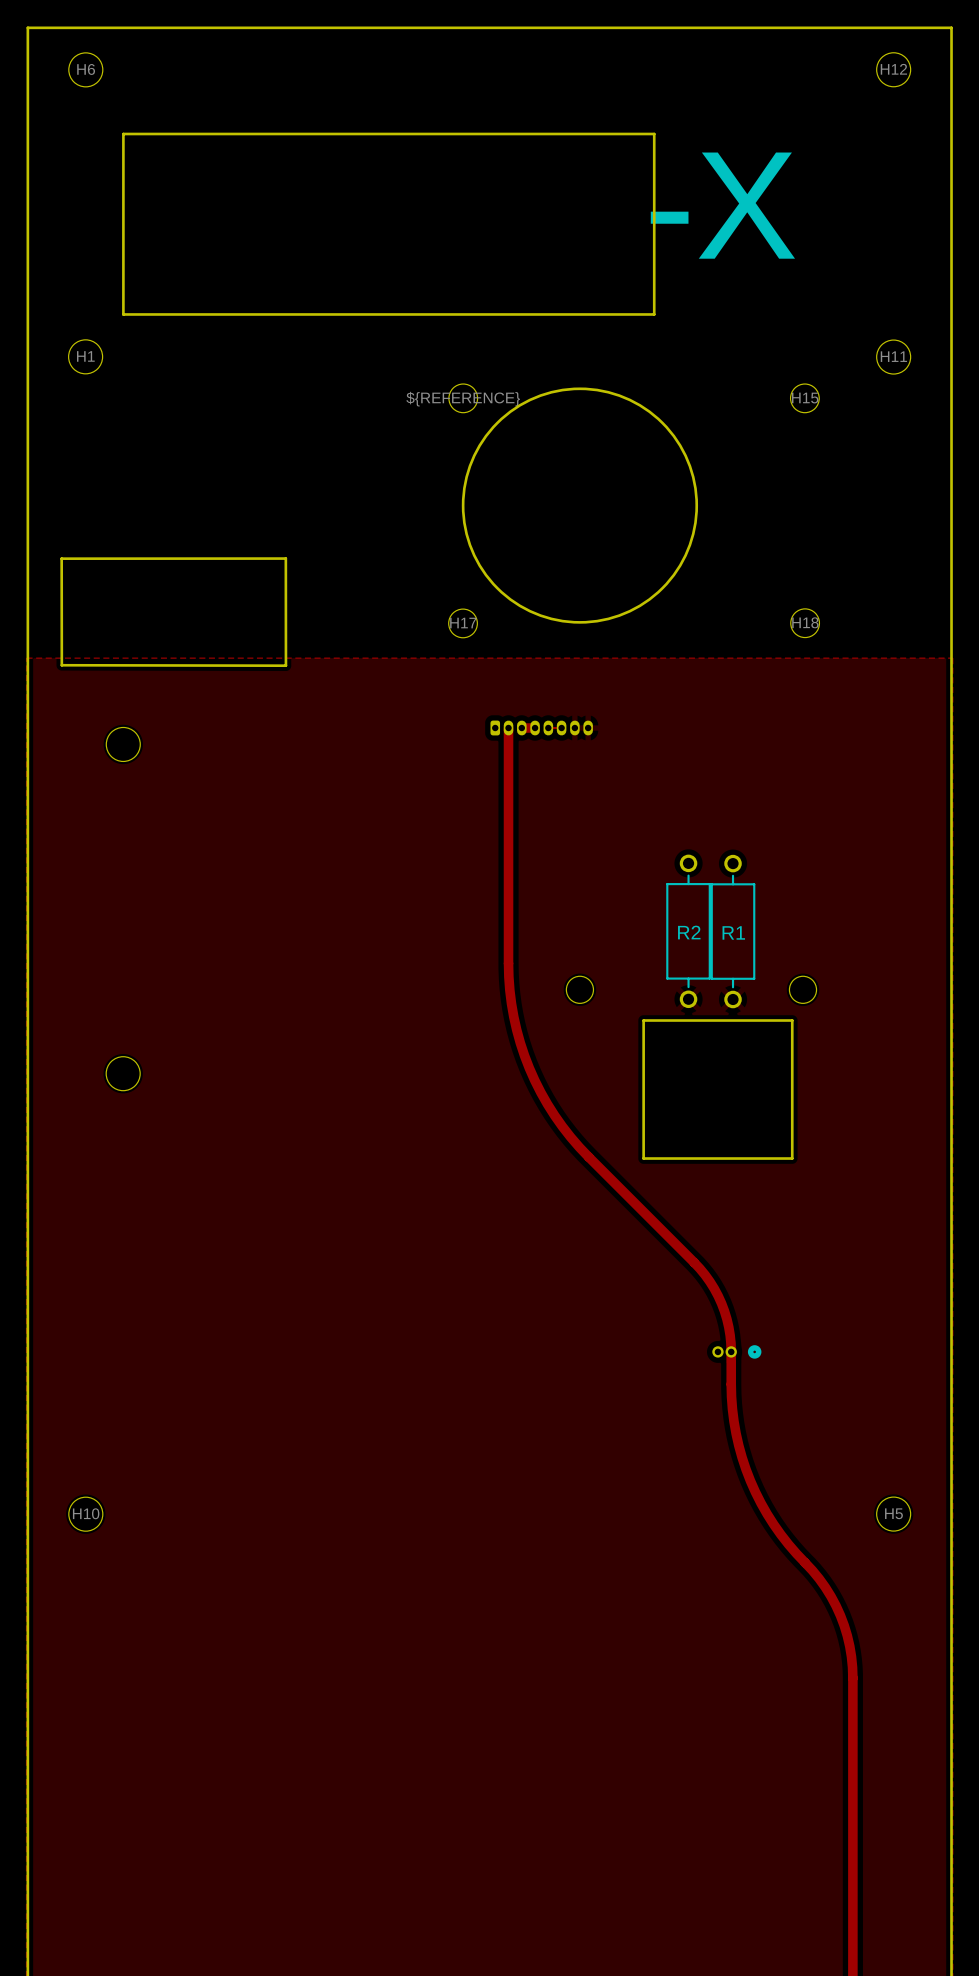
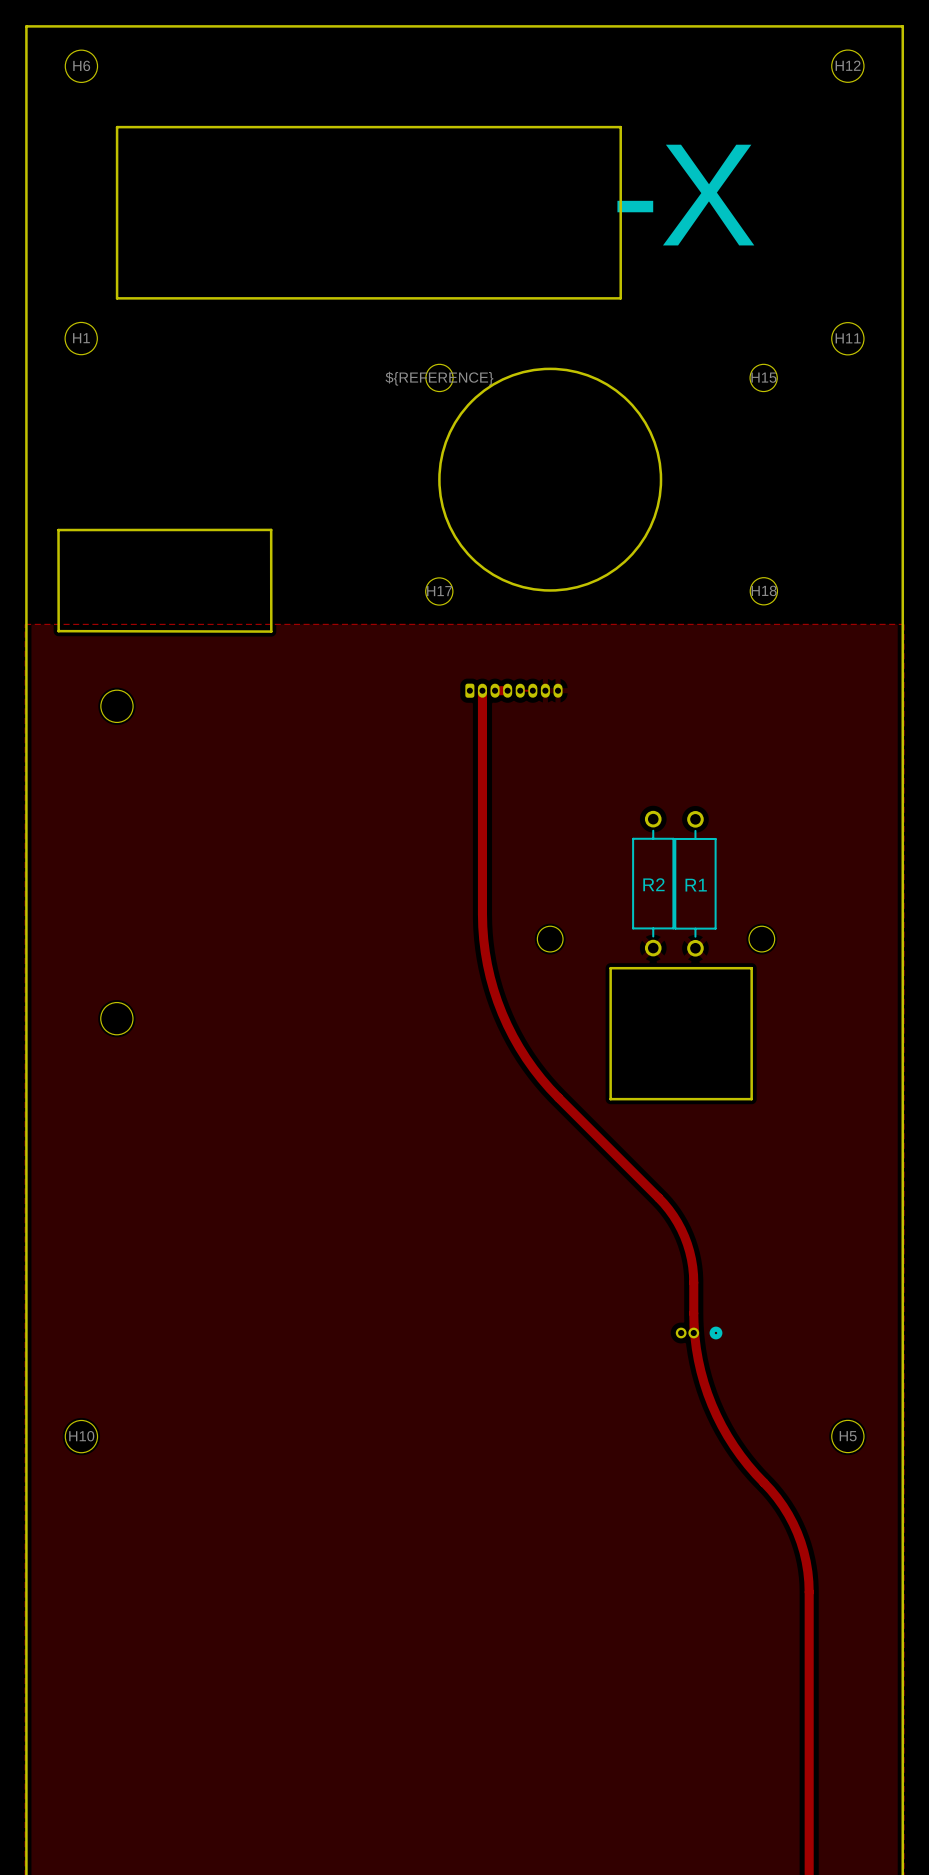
part position: (736, 1351) -> (699, 1333)

